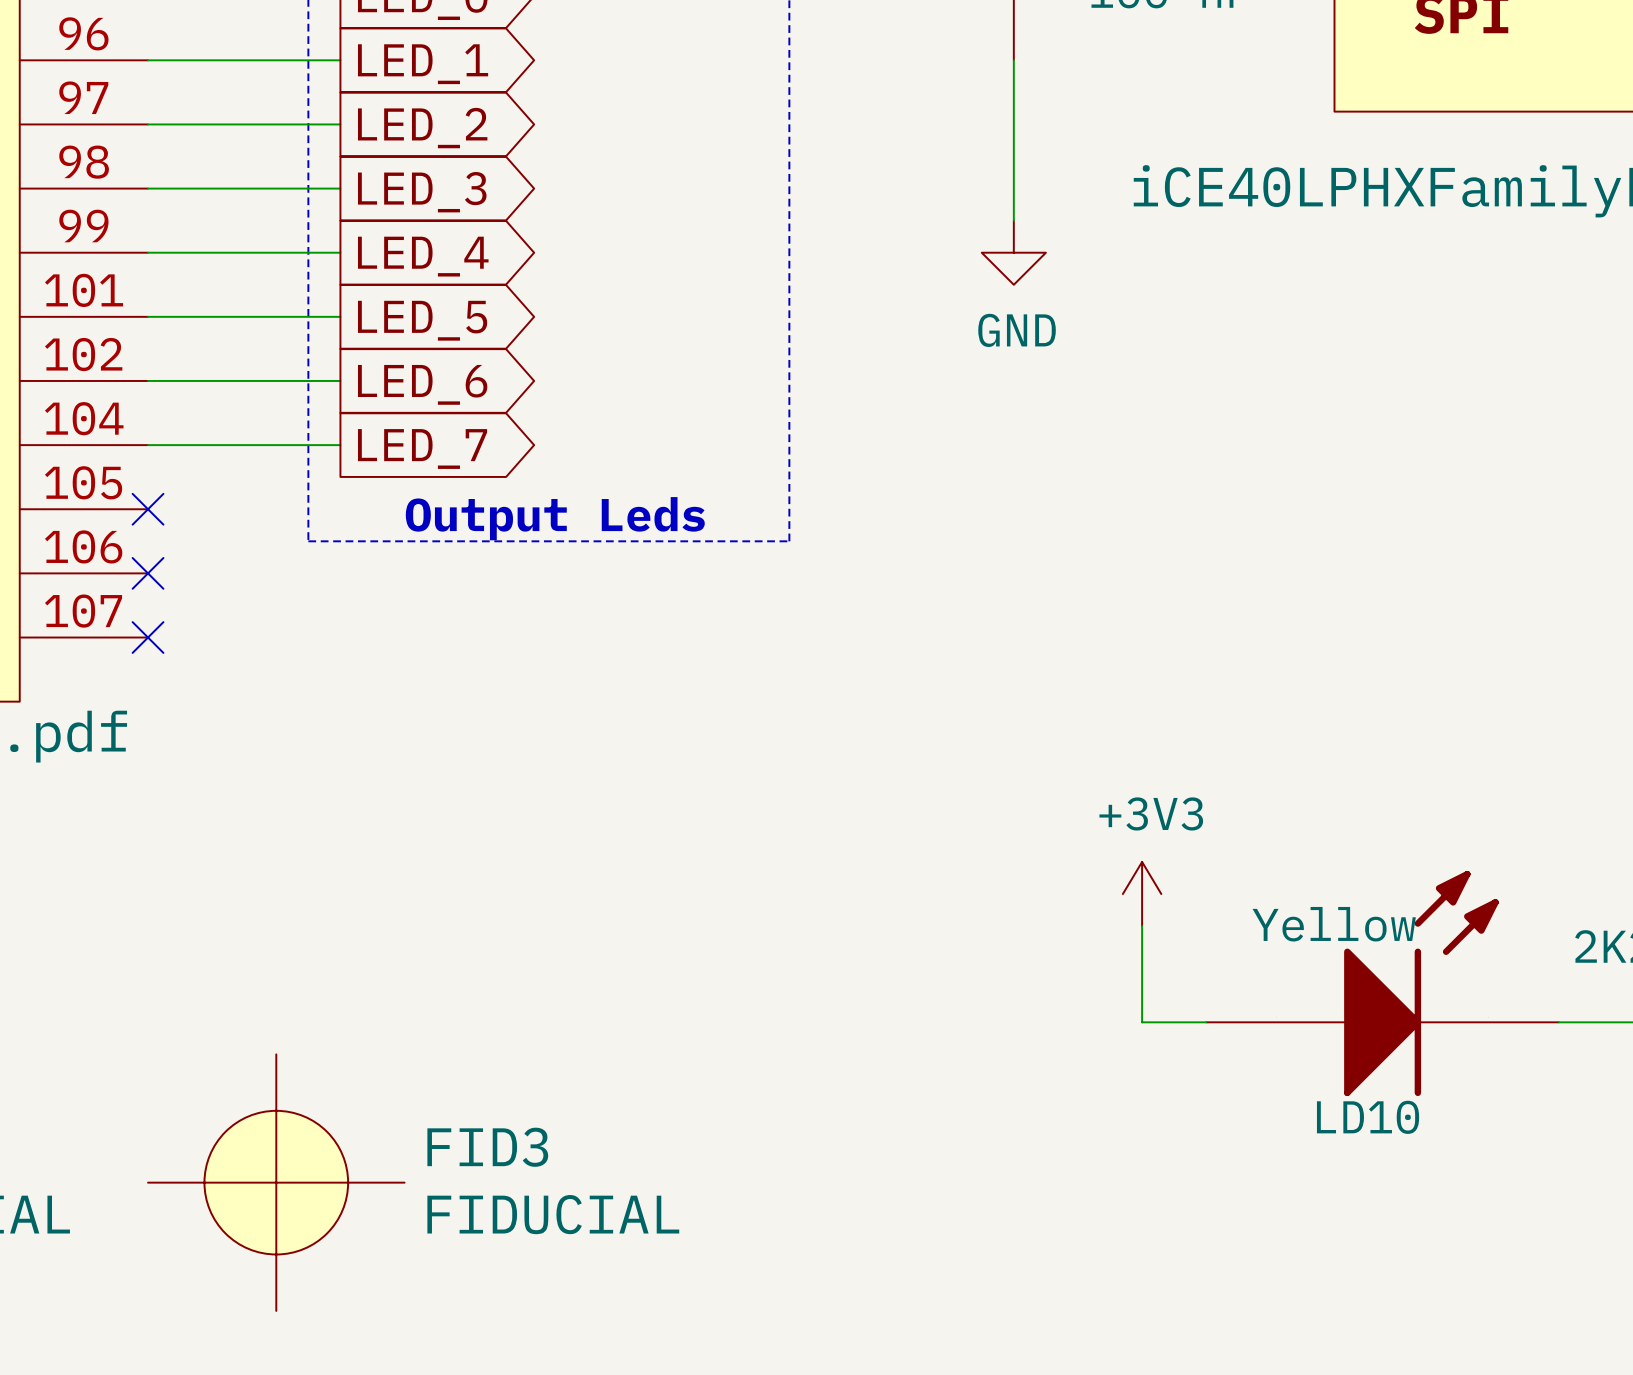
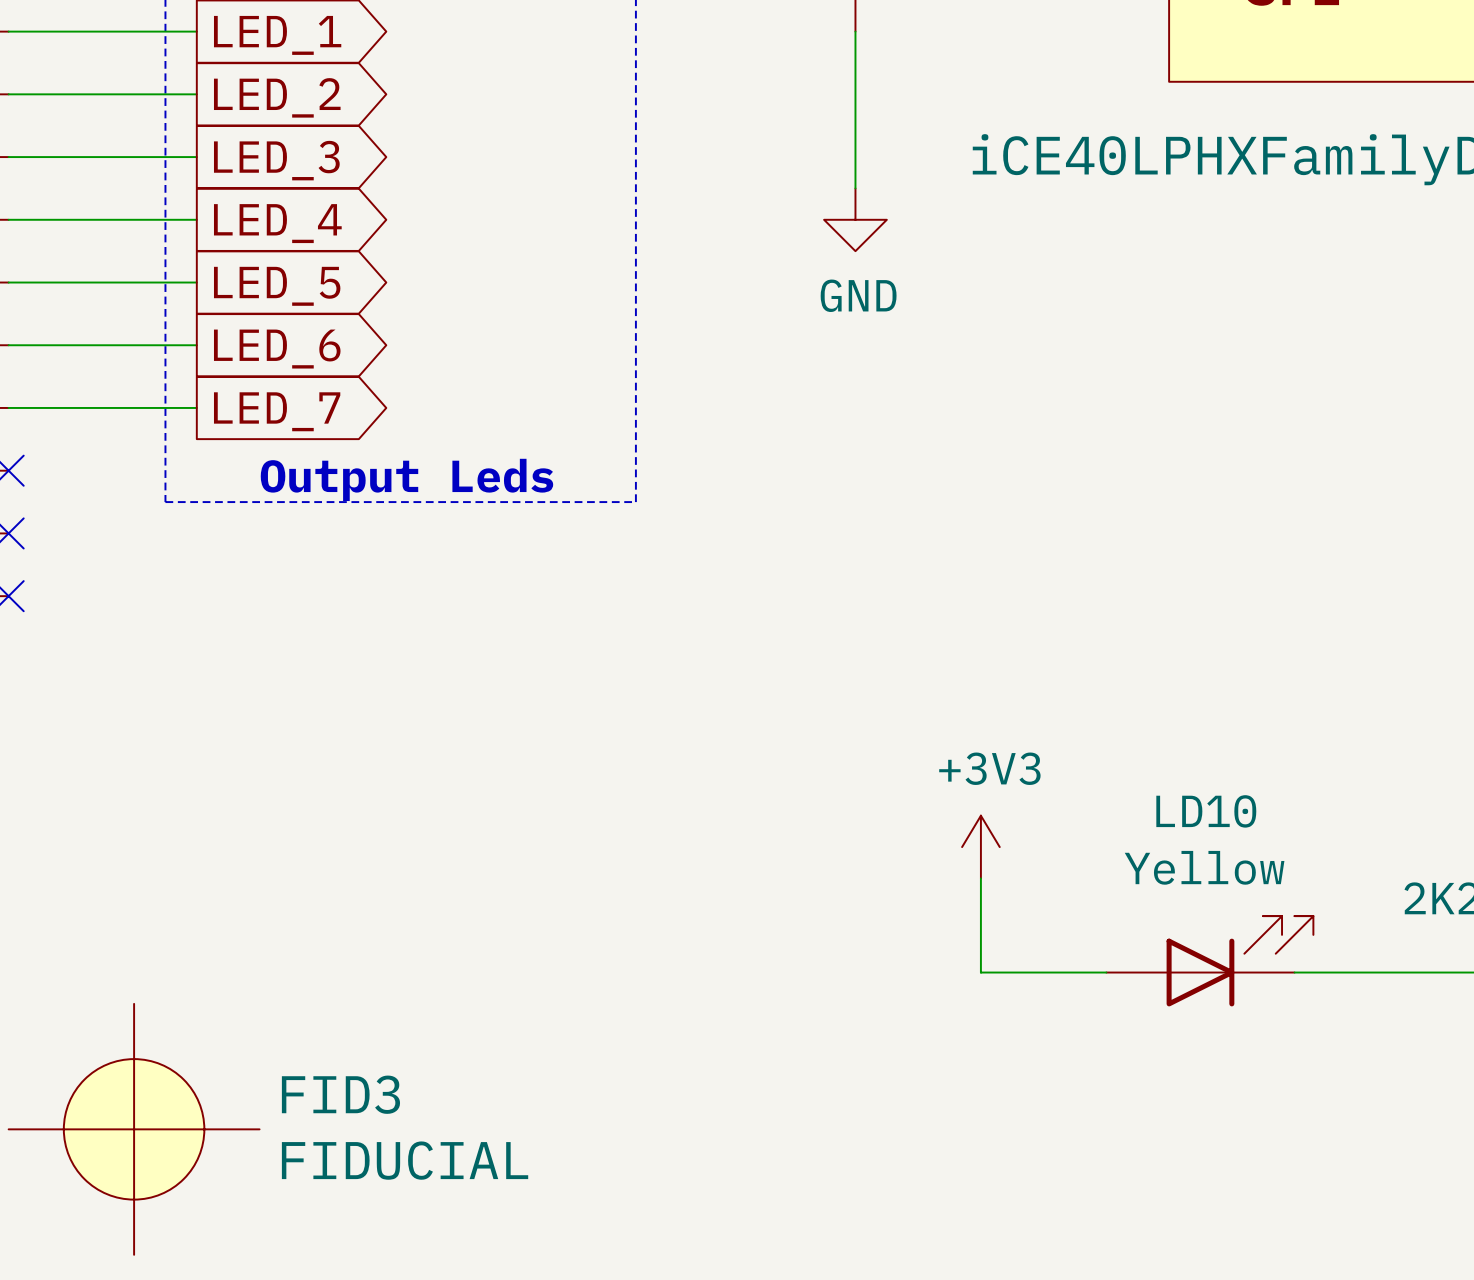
LD10 symbol: [1206, 870, 1559, 1097] -> [1106, 916, 1314, 1007]
LD10 value position: Yellow (1334, 924) -> Yellow (1204, 867)
LD10 name position: LD10 (1368, 1117) -> LD10 (1206, 811)

